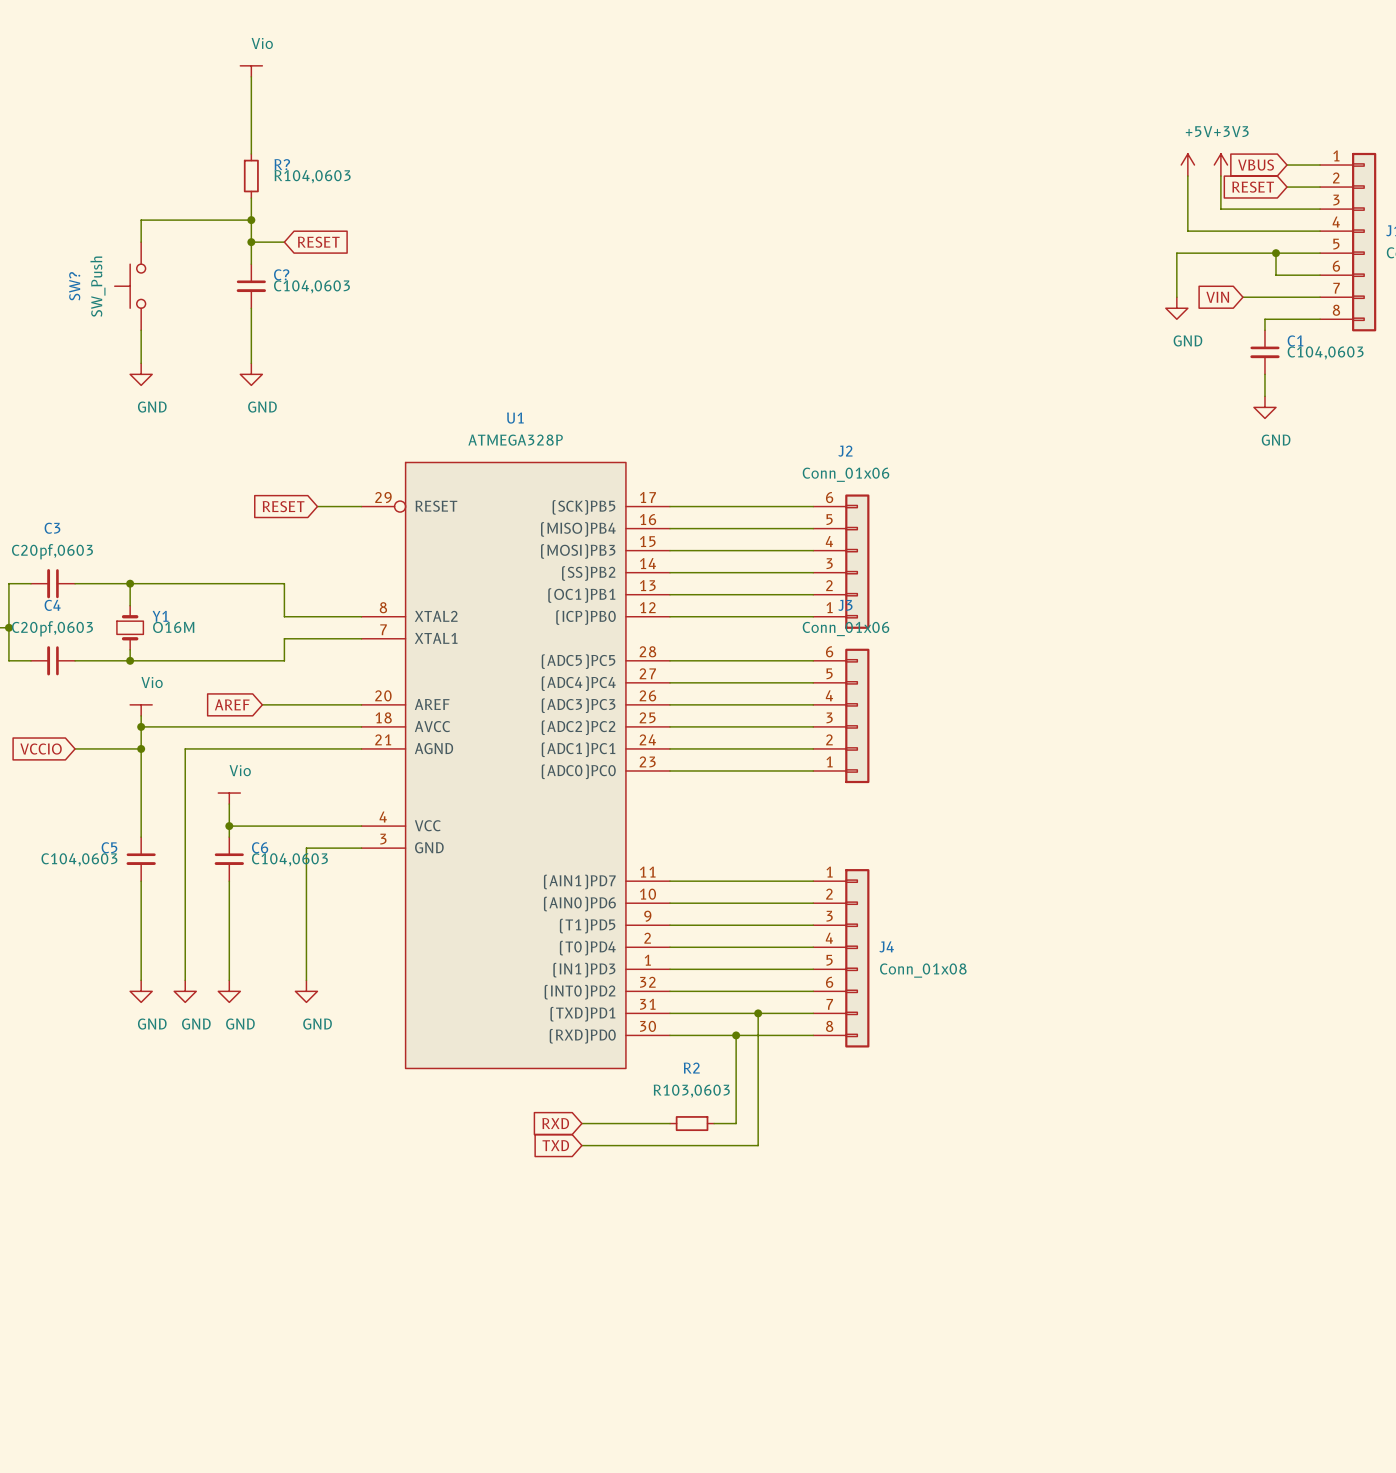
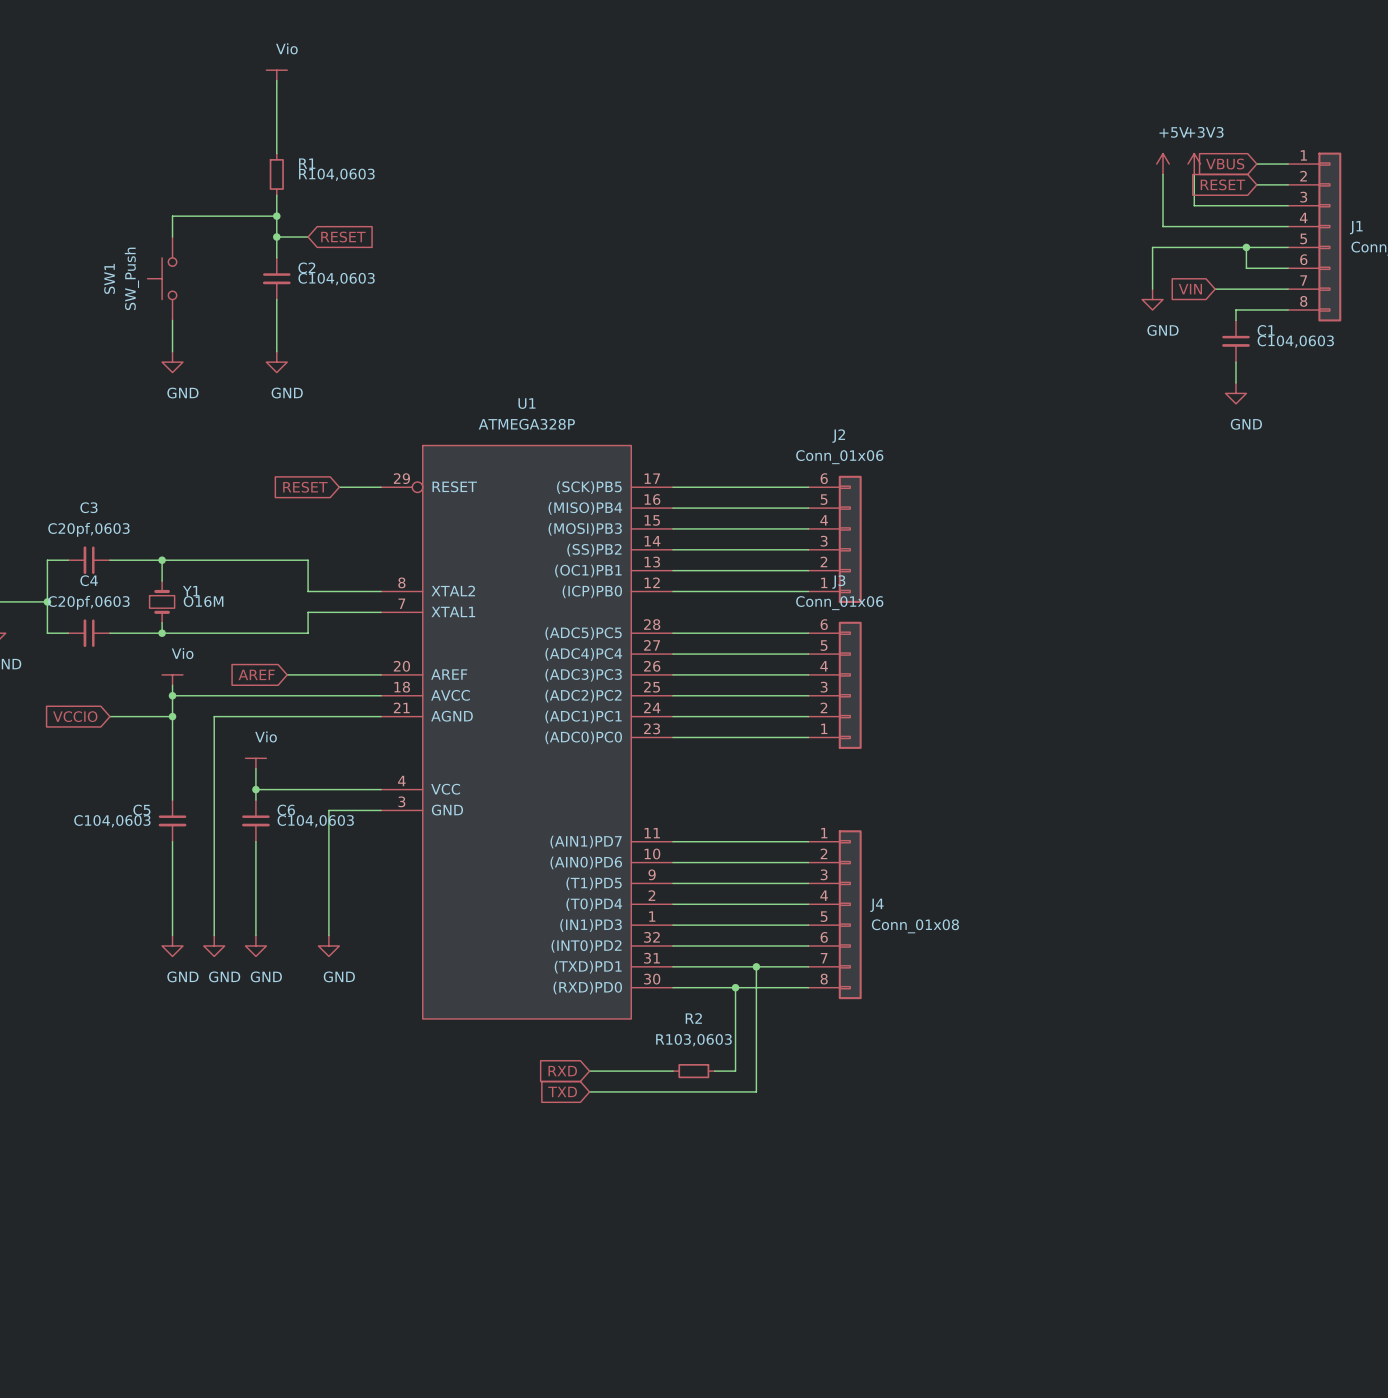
R? name: R? (282, 164) -> R1 (307, 163)
C? name: C? (281, 274) -> C2 (306, 267)
SW? name: SW? (74, 286) -> SW1 (109, 278)

